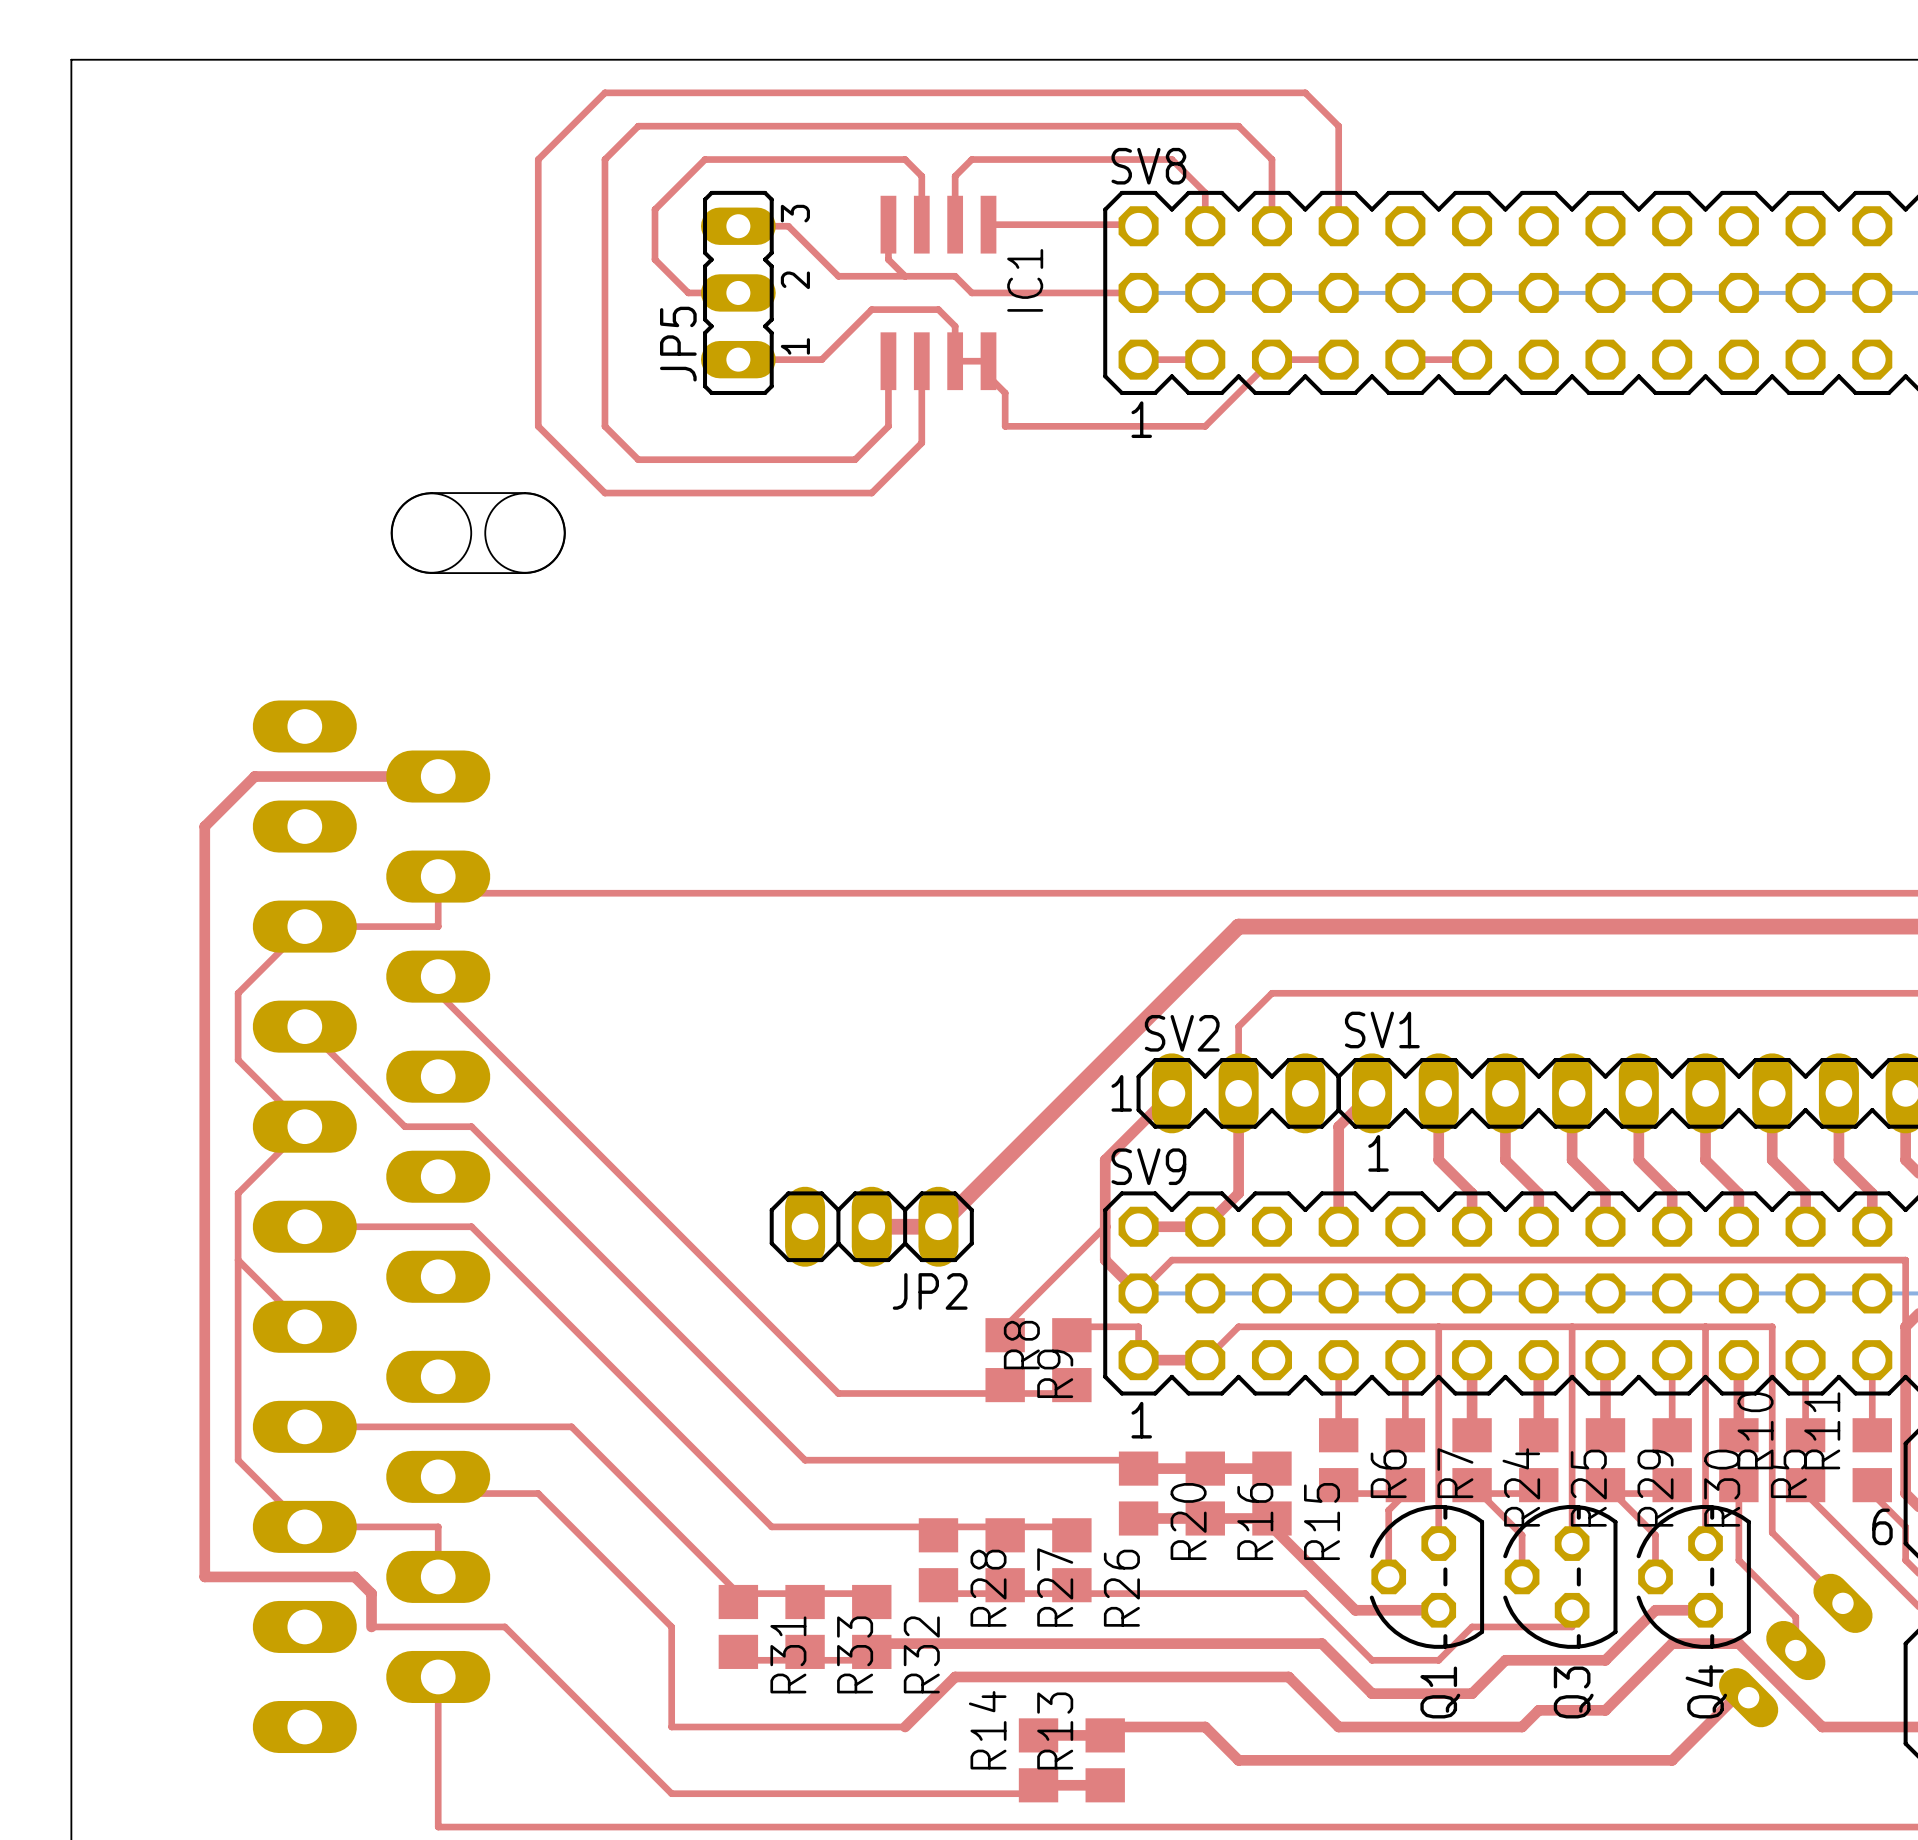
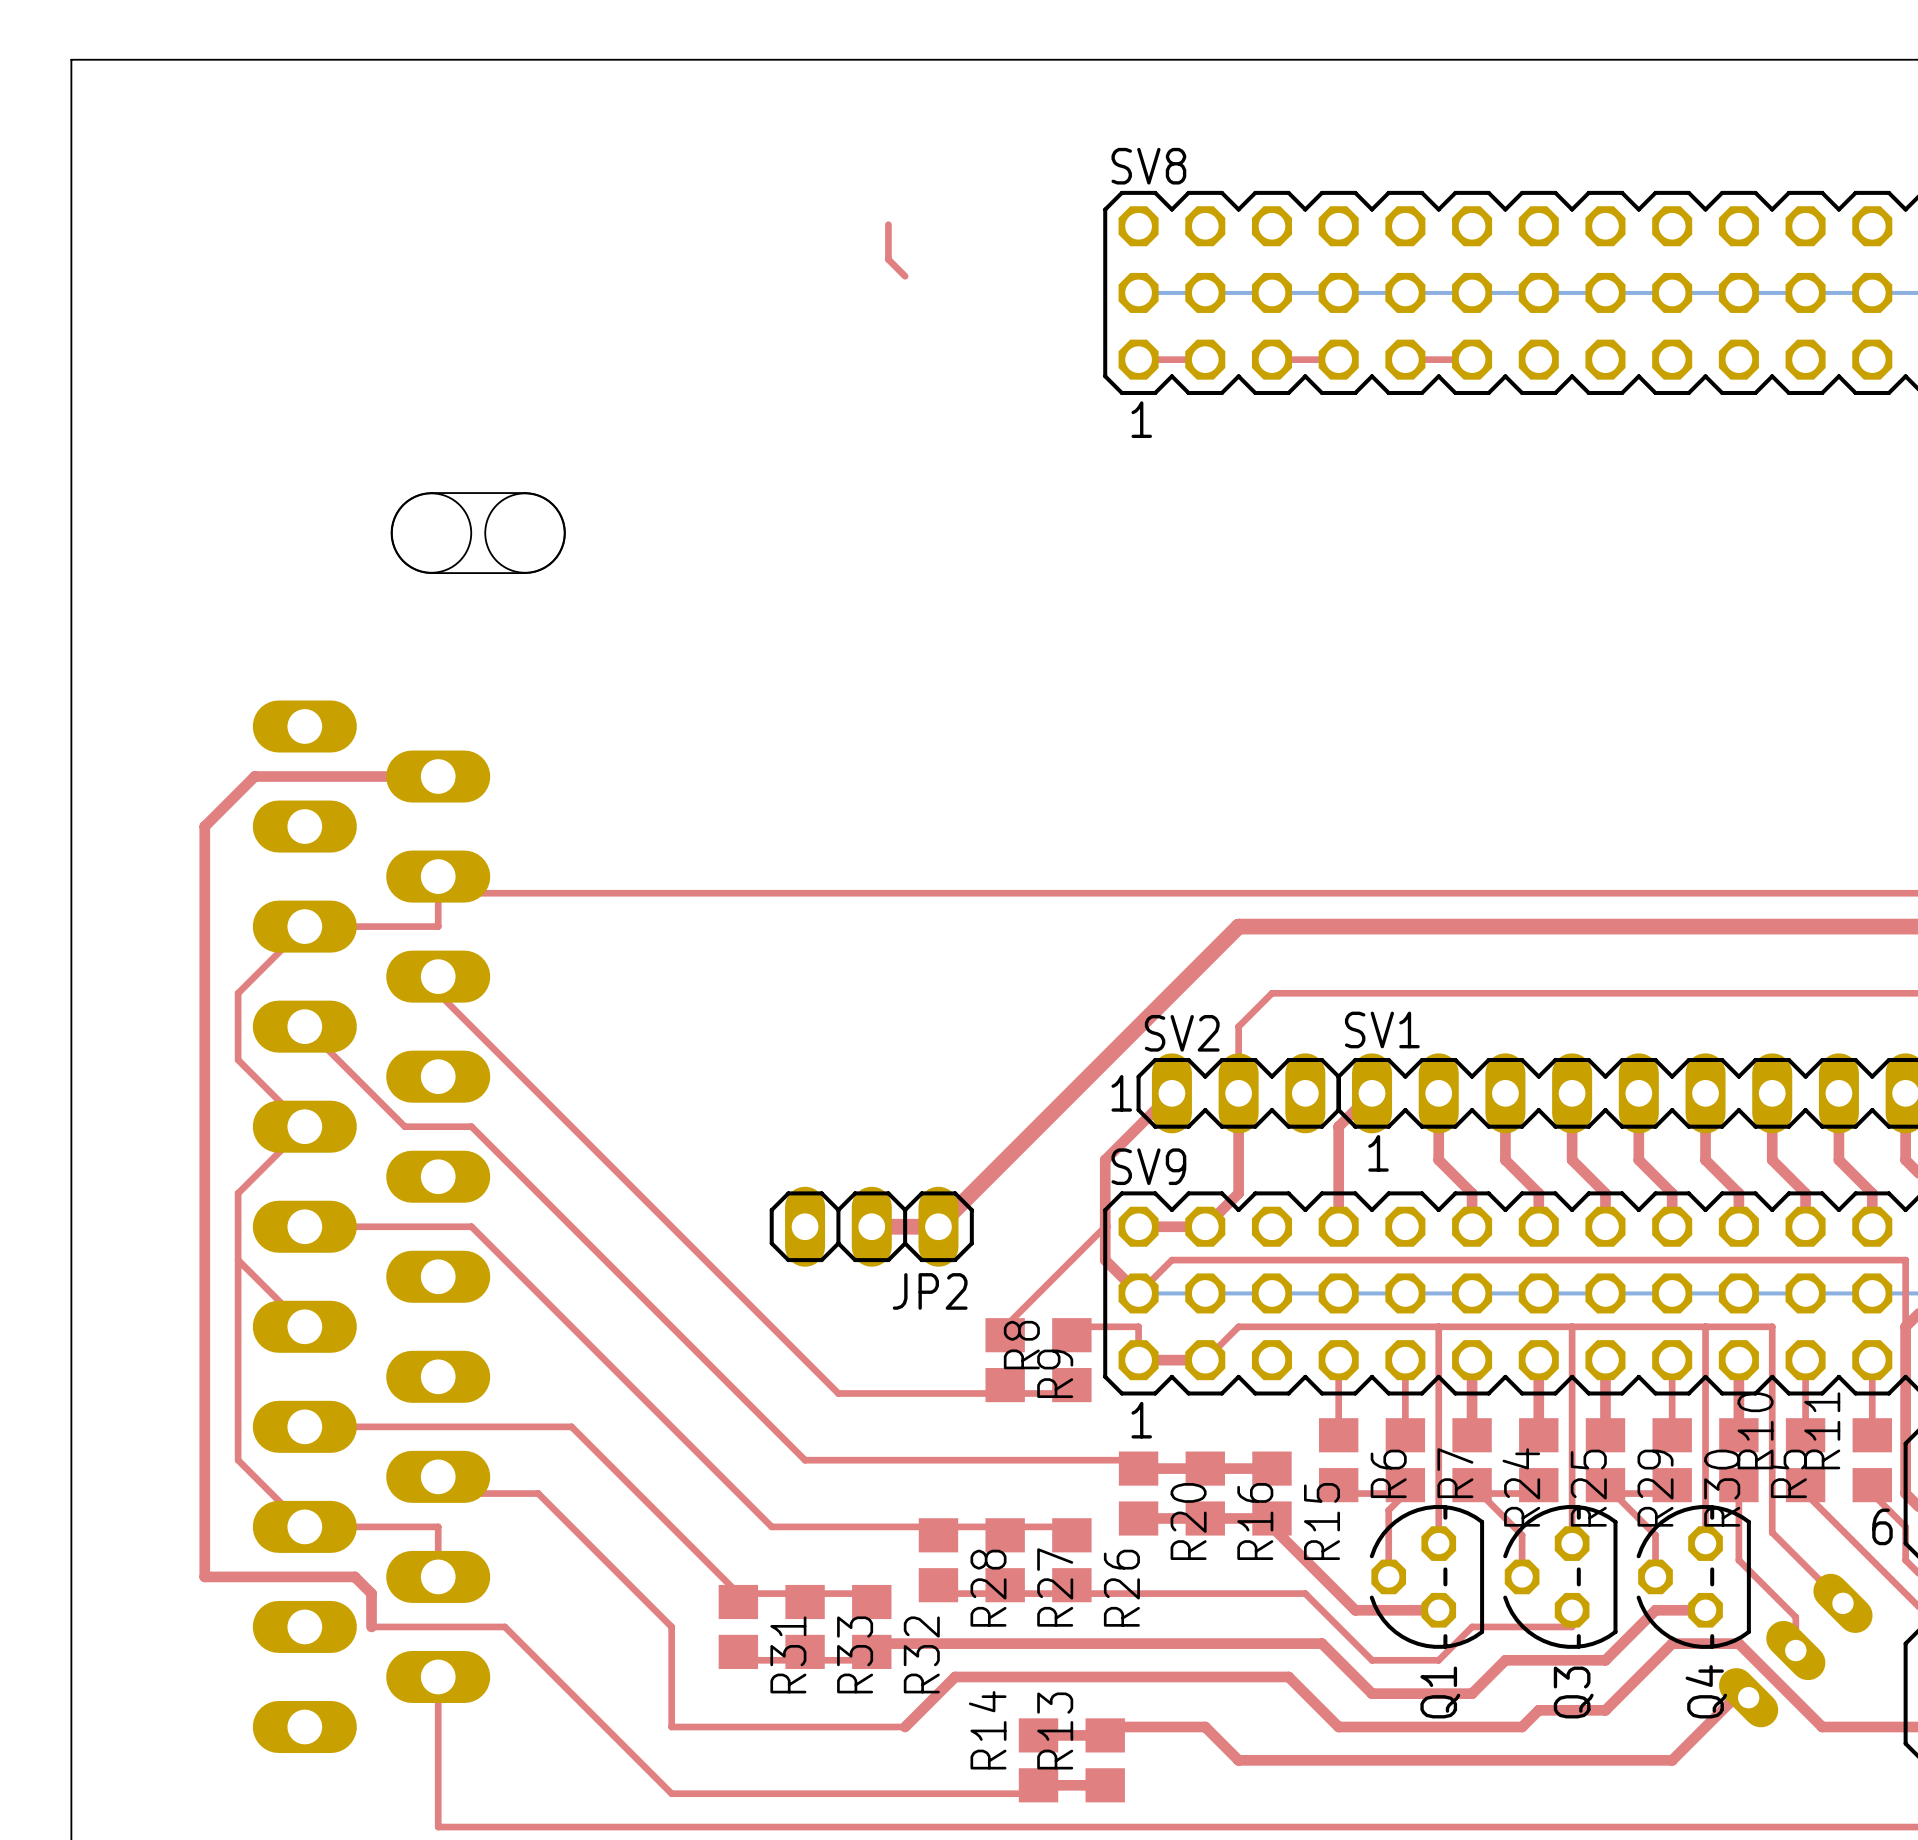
top track: (921, 224) (921, 176) (905, 159) (705, 159) (655, 209) (655, 259) (688, 292) (738, 292) -> none
top track: (955, 224) (955, 176) (971, 159) (1171, 159) (1205, 192) (1205, 226) -> none
top track: (988, 224) (1137, 224) (1138, 226) -> none
top track: (738, 226) (788, 226) (838, 276) (955, 276) (971, 292) (1138, 292) -> none
top track: (1271, 226) (1271, 159) (1238, 126) (638, 126) (604, 159) (604, 426) (638, 459) (855, 459) (888, 426) (888, 361) -> none
top track: (1338, 226) (1338, 126) (1305, 92) (604, 92) (538, 159) (538, 426) (604, 493) (871, 493) (921, 443) (921, 361) -> none
JP5: (738, 292) -> none
IC1: (938, 292) -> none
top track: (738, 359) (821, 359) (871, 309) (938, 309) (955, 326) (955, 361) (988, 361) (988, 376) (1005, 392) (1005, 426) (1205, 426) (1271, 359) -> none

